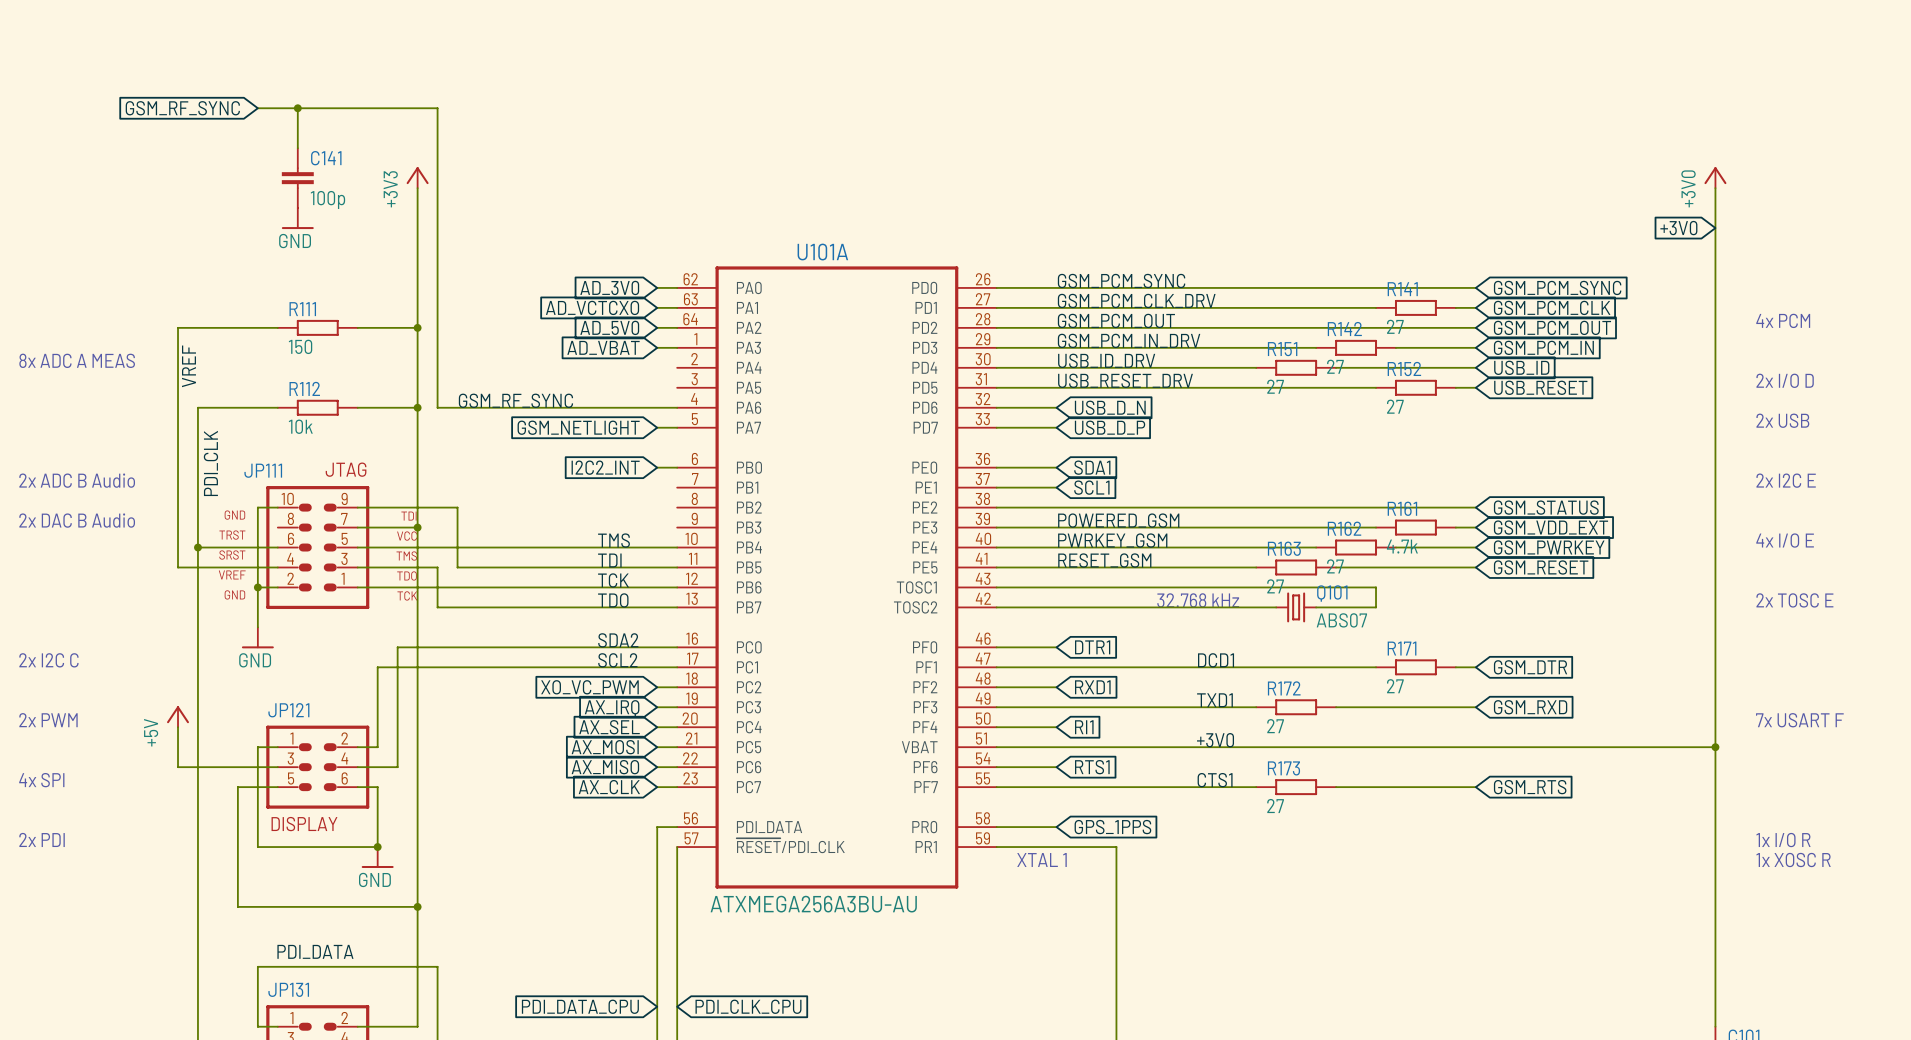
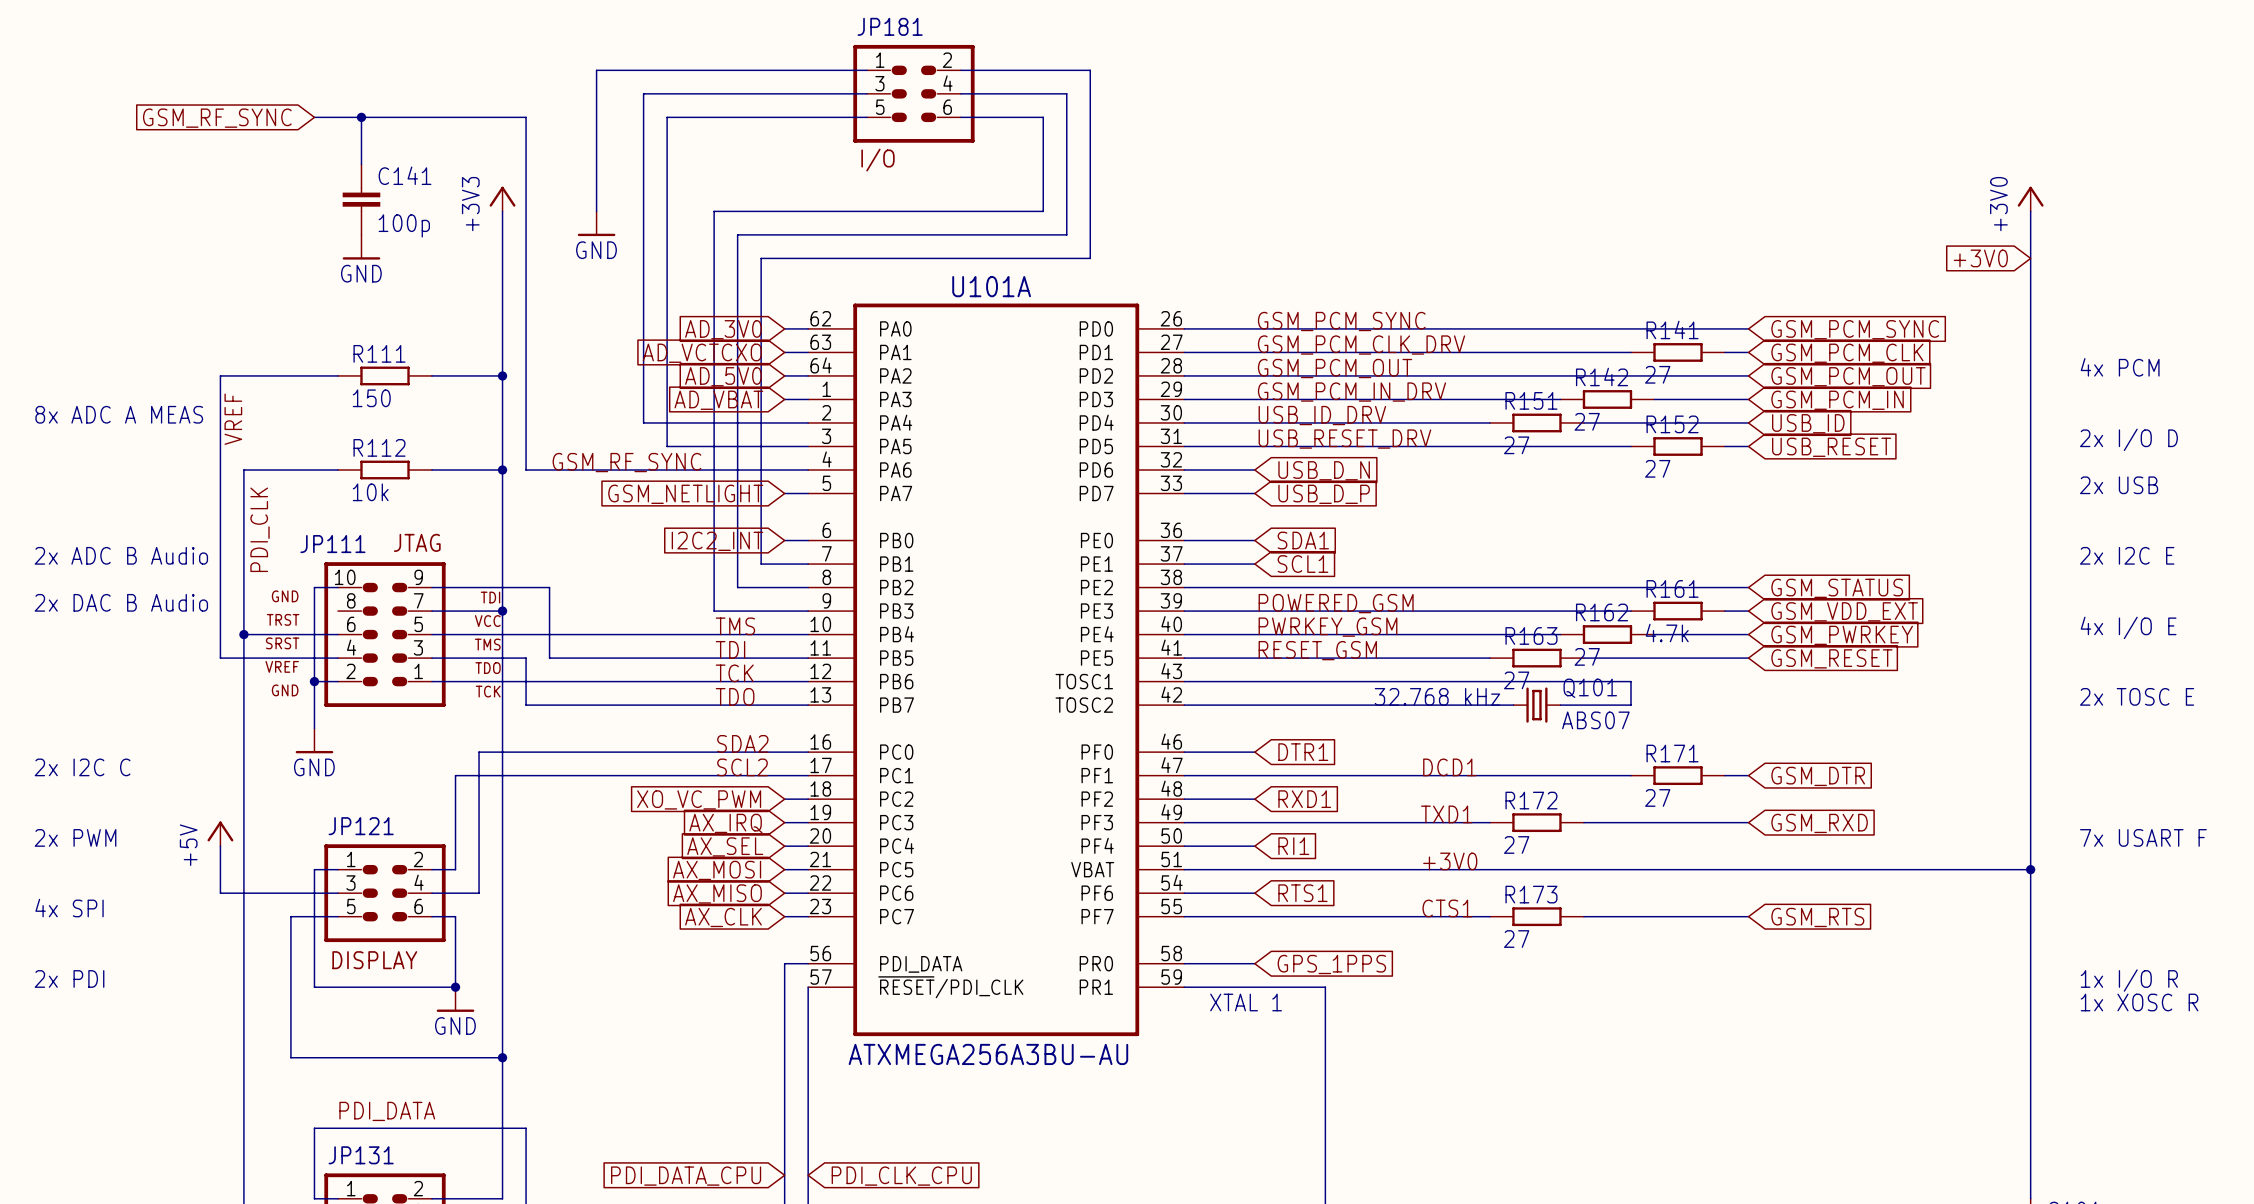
wire: none -> (866, 70) (596, 70) (596, 211)
wire: none -> (960, 70) (1090, 70) (1090, 258) (761, 258) (761, 564) (808, 564)
wire: none -> (866, 93) (643, 93) (643, 422) (808, 422)
JP181: none -> (913, 93)
wire: none -> (960, 93) (1066, 93) (1066, 234) (737, 234) (737, 587) (808, 587)
wire: none -> (866, 117) (667, 117) (667, 446) (808, 446)
wire: none -> (960, 117) (1043, 117) (1043, 211) (714, 211) (714, 611) (808, 611)
text: none -> I/O (878, 160)
power symbol: none -> GND (596, 223)

